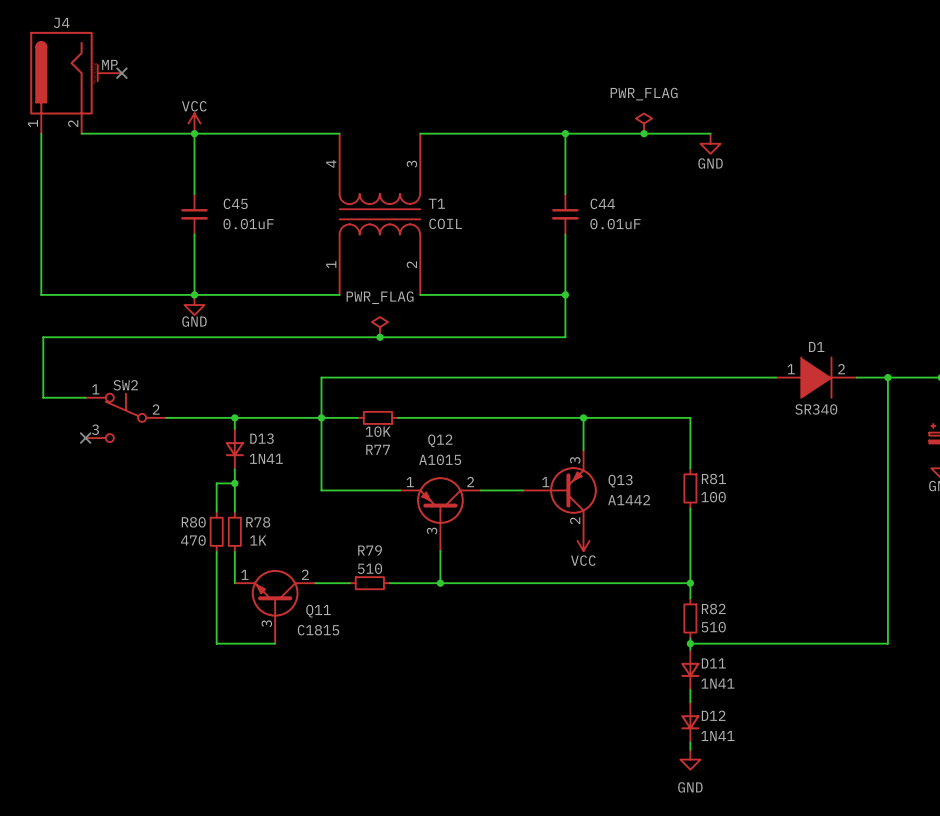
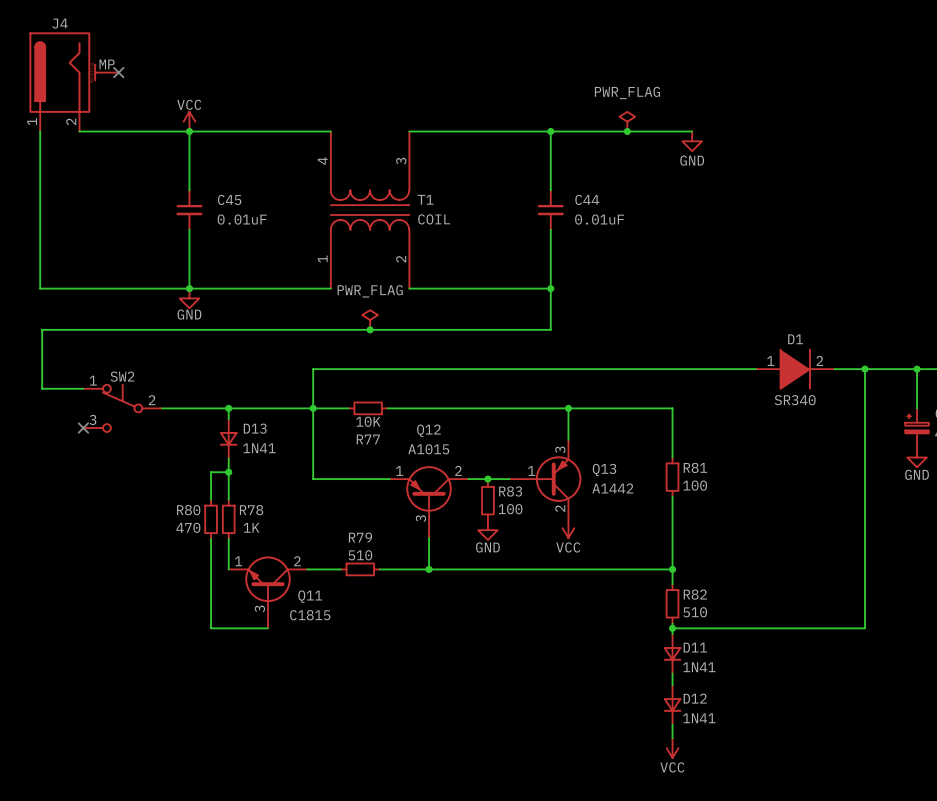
junction: none -> (487, 479)
R83: none -> 100 (487, 500)
power symbol: none -> GND (487, 530)
power symbol: GND (690, 759) -> VCC (672, 748)

